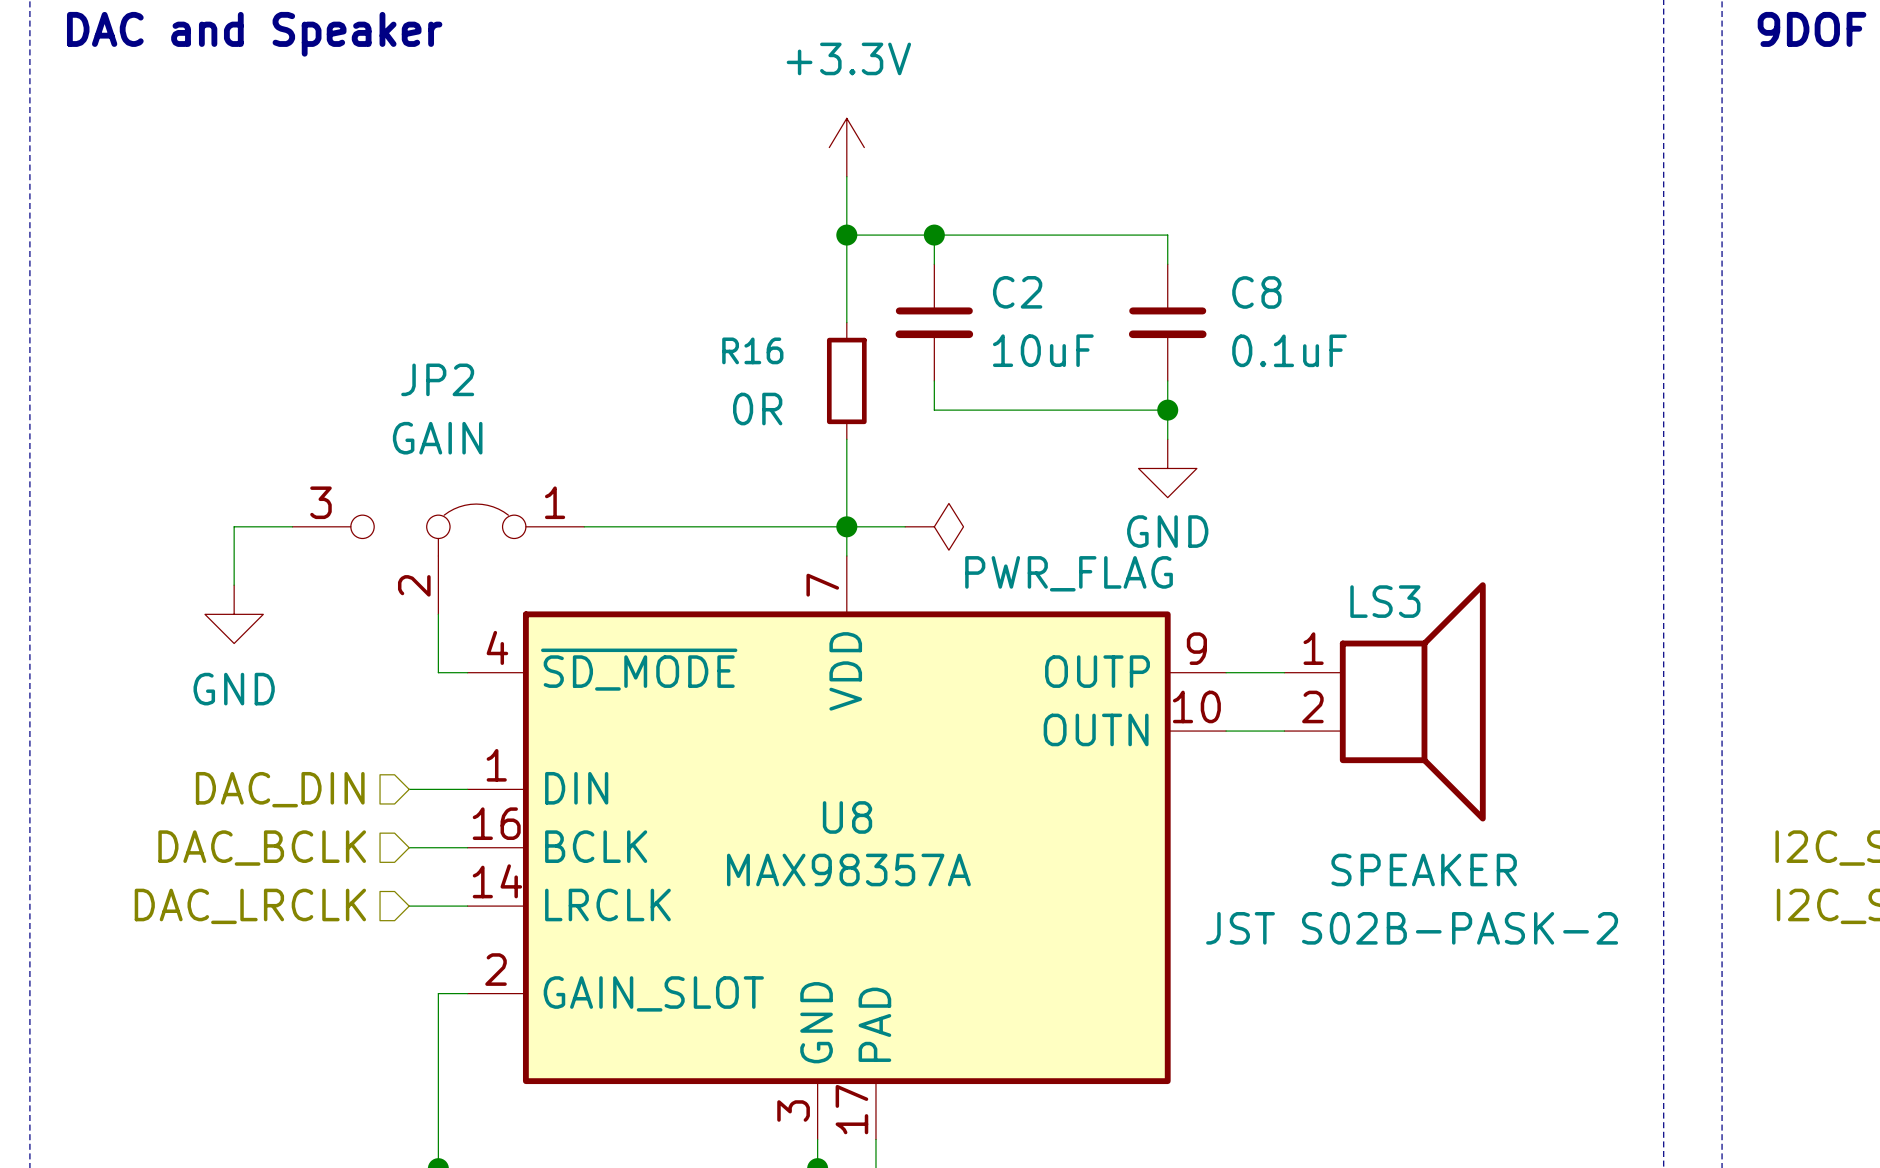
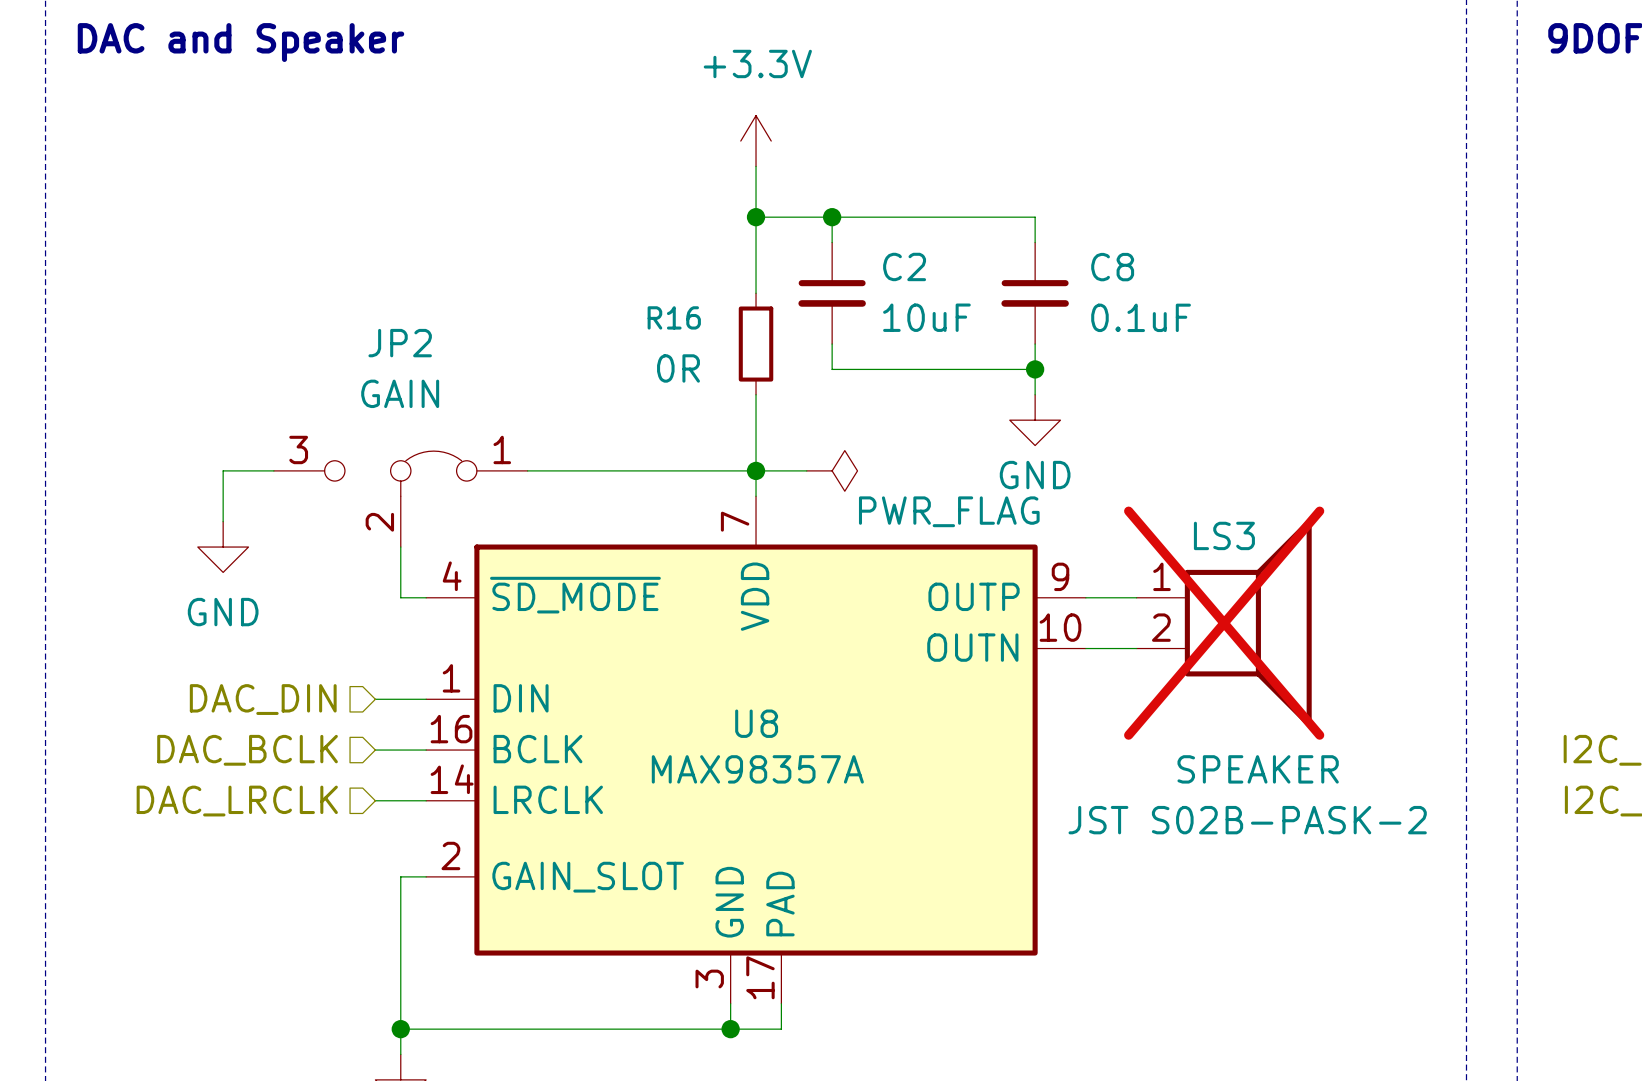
LS3 do-not-place cross: none -> (1224, 623)

